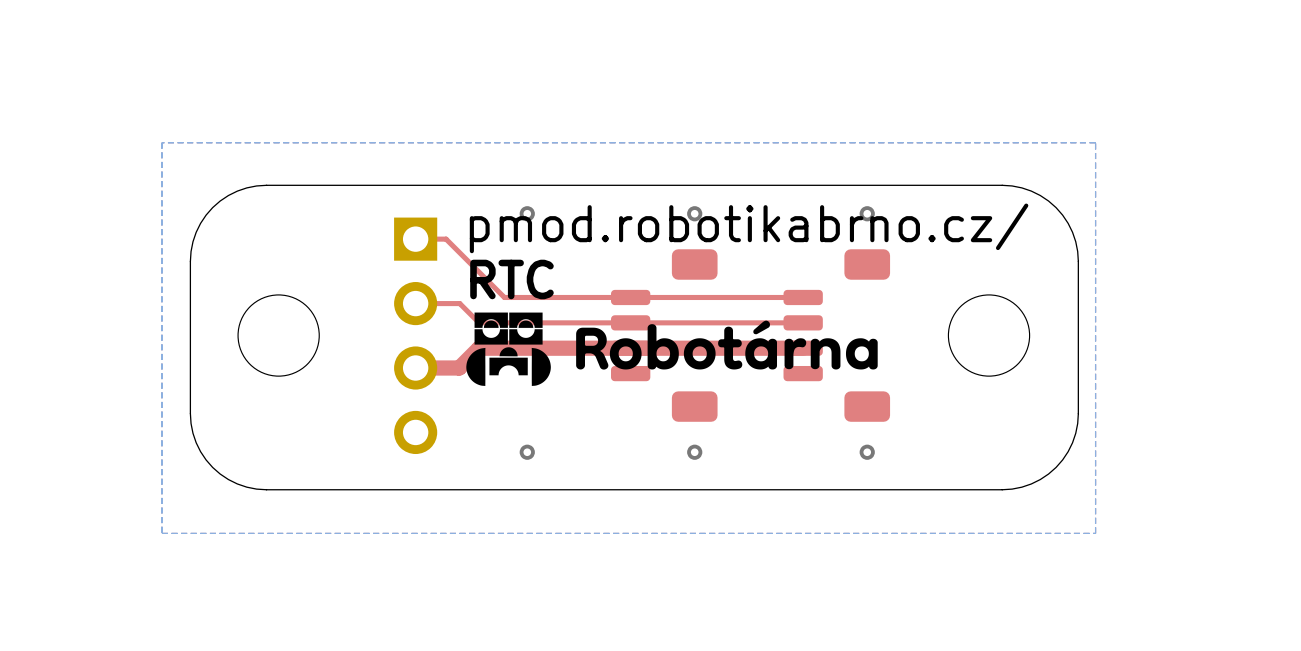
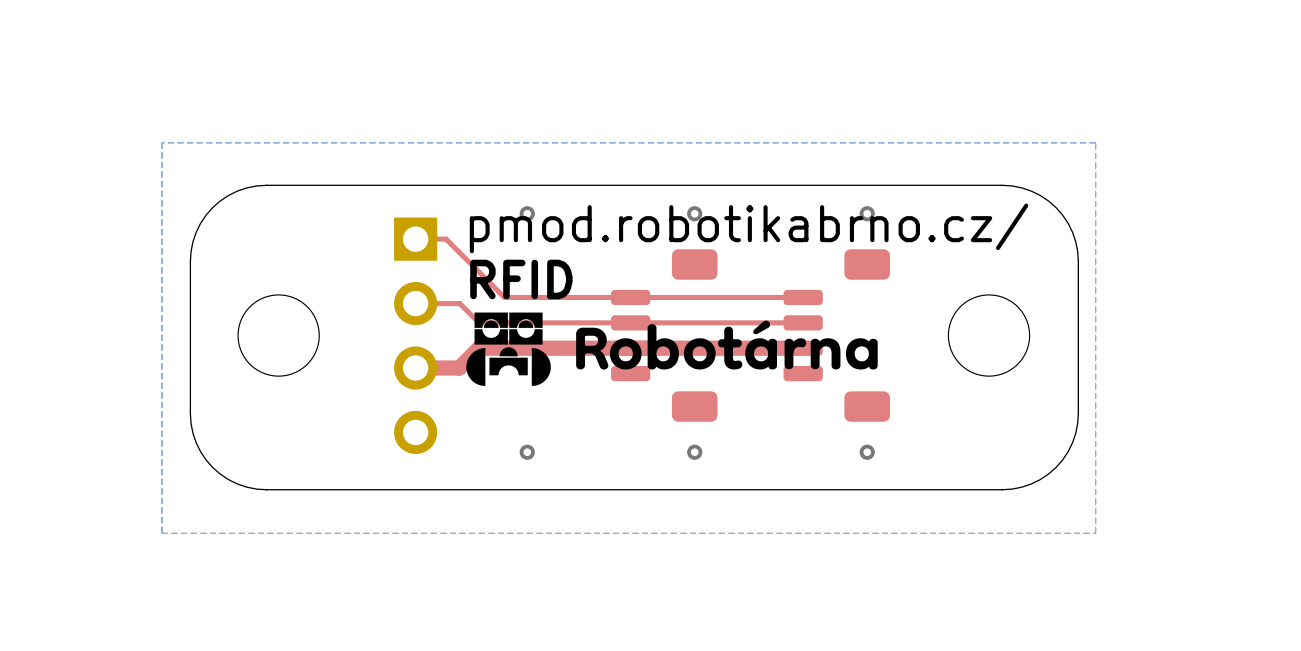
text: RTC (511, 279) -> RFID (521, 279)

